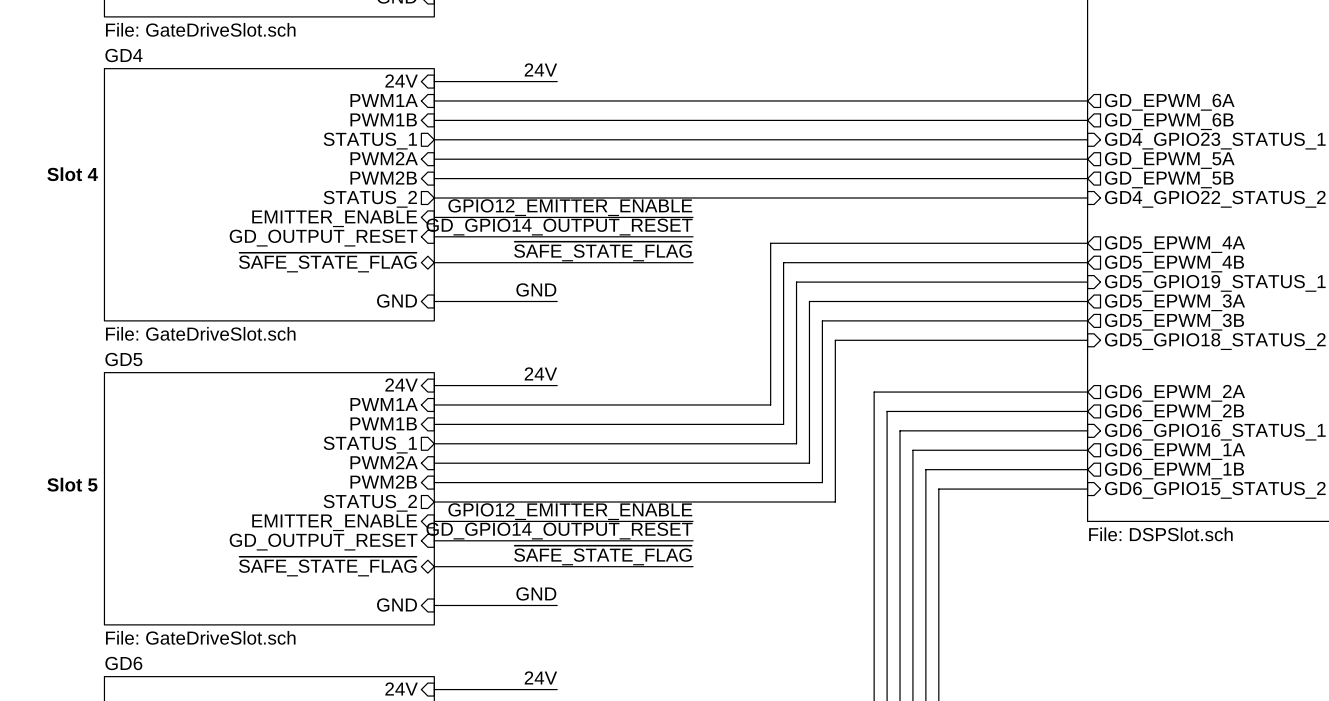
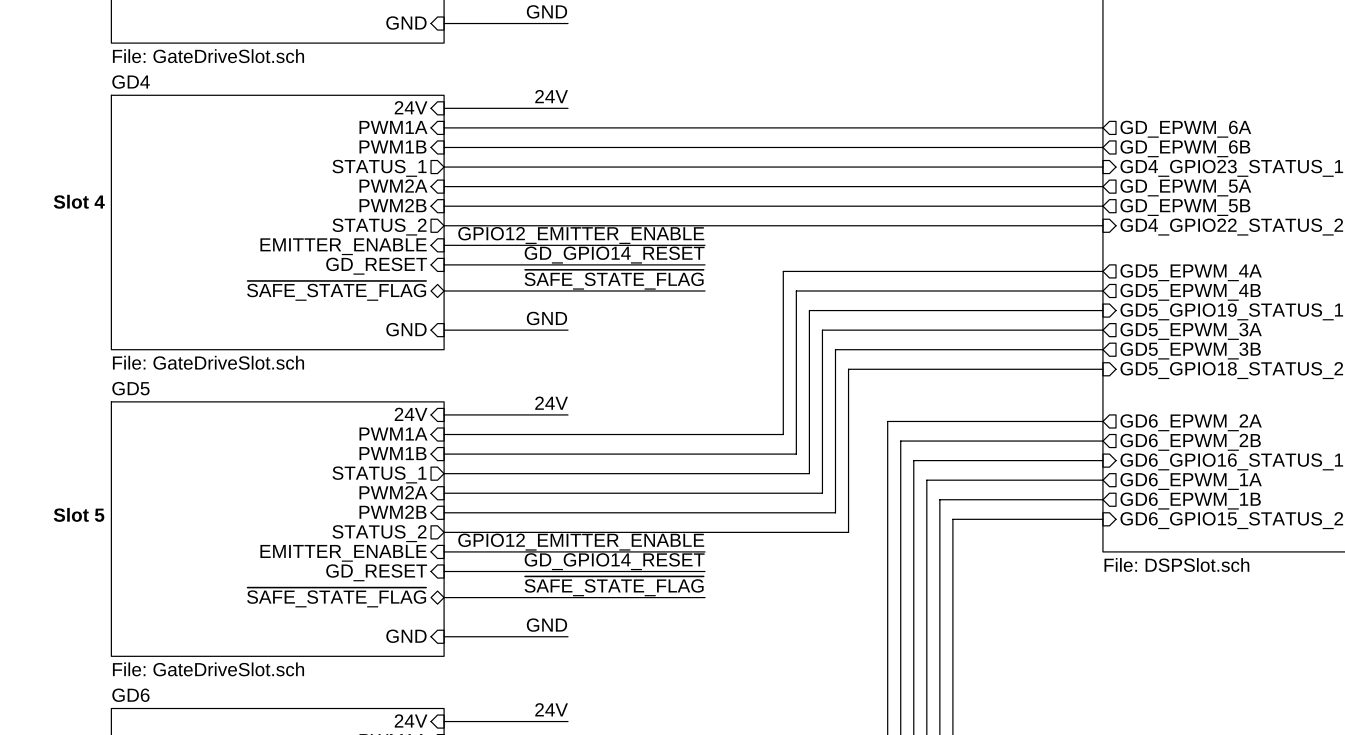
label: GD_GPIO14_OUTPUT_RESET (559, 227) -> GD_GPIO14_RESET (614, 255)
sheet pin: GD_OUTPUT_RESET (323, 238) -> GD_RESET (376, 266)
label: GD_GPIO14_OUTPUT_RESET (559, 531) -> GD_GPIO14_RESET (614, 561)
sheet pin: GD_OUTPUT_RESET (323, 542) -> GD_RESET (376, 572)

